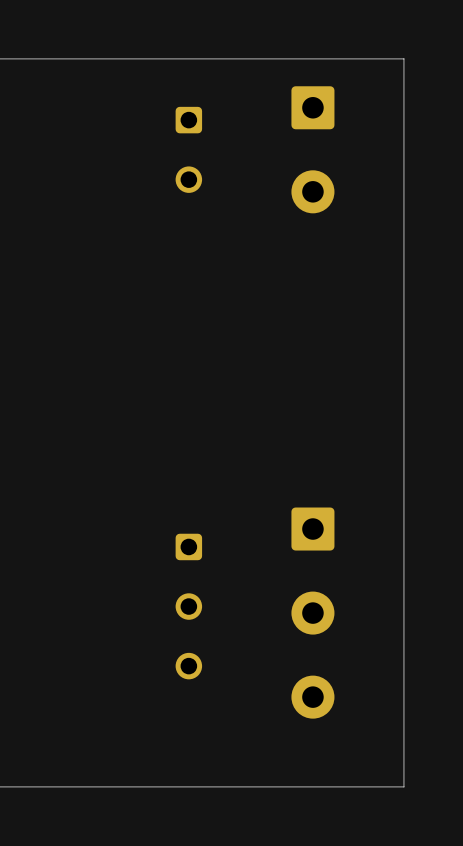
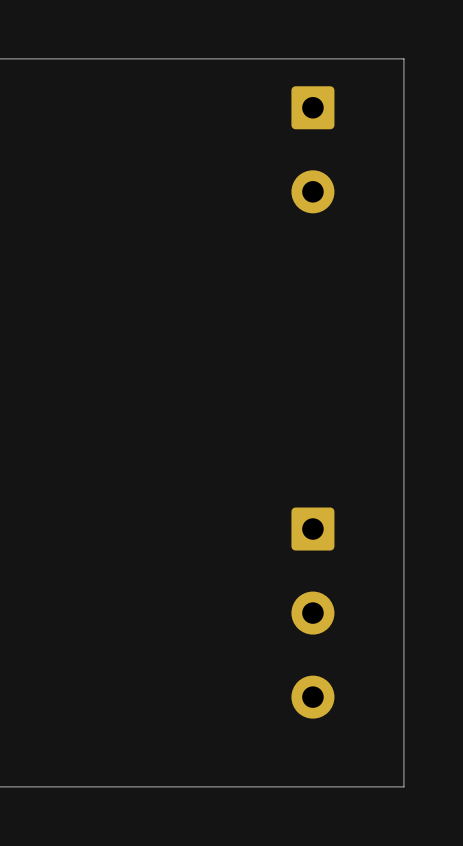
part: (188, 149) -> none
part: (188, 606) -> none

